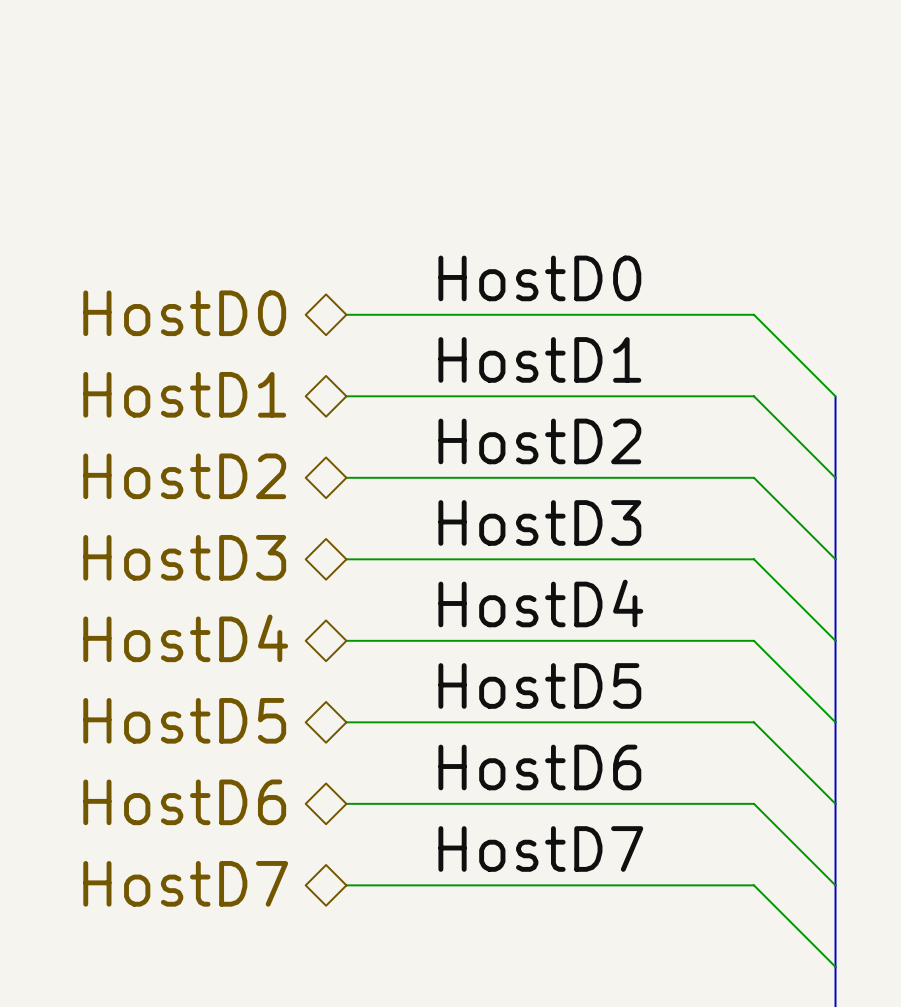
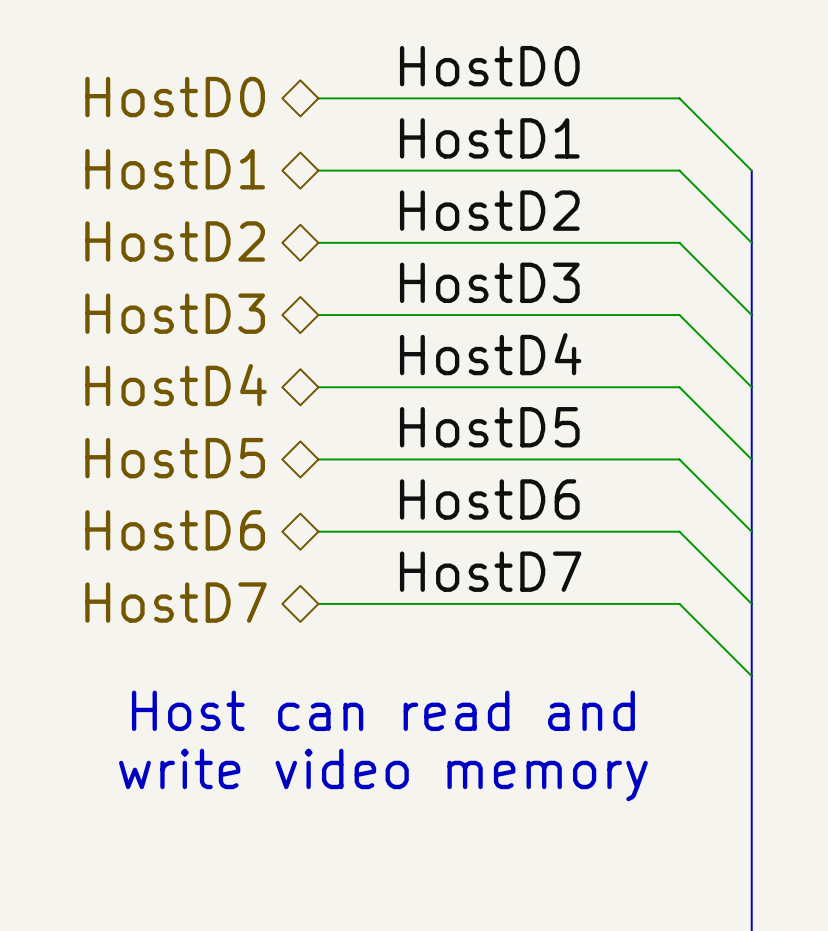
bus: none -> (751, 170) (751, 351)
label position: HostD0 (539, 278) -> HostD0 (489, 66)
hierarchical label position: HostD0 (184, 313) -> HostD0 (175, 97)
wire: (346, 314) (753, 314) (835, 396) -> (318, 98) (679, 98) (751, 170)
label position: HostD1 (539, 359) -> HostD1 (489, 138)
hierarchical label position: HostD1 (184, 394) -> HostD1 (175, 169)
wire: (346, 396) (753, 396) (835, 477) -> (318, 170) (679, 170) (751, 242)
label position: HostD2 (539, 441) -> HostD2 (489, 210)
hierarchical label position: HostD2 (184, 476) -> HostD2 (175, 241)
wire: (346, 477) (753, 477) (835, 559) -> (318, 242) (679, 242) (751, 315)
label position: HostD3 (539, 522) -> HostD3 (489, 282)
hierarchical label position: HostD3 (184, 557) -> HostD3 (175, 313)
wire: (346, 559) (753, 559) (835, 640) -> (318, 315) (679, 315) (751, 387)
label position: HostD4 (540, 603) -> HostD4 (490, 354)
hierarchical label position: HostD4 (185, 638) -> HostD4 (176, 385)
wire: (346, 640) (753, 640) (835, 722) -> (318, 387) (679, 387) (751, 459)
label position: HostD5 (539, 685) -> HostD5 (489, 427)
hierarchical label position: HostD5 (184, 720) -> HostD5 (175, 458)
wire: (346, 722) (753, 722) (835, 803) -> (318, 459) (679, 459) (751, 531)
label position: HostD6 (539, 767) -> HostD6 (489, 499)
hierarchical label position: HostD6 (184, 802) -> HostD6 (175, 530)
text: none -> Host can read and (383, 710)
wire: (346, 803) (753, 803) (835, 885) -> (318, 531) (679, 531) (751, 603)
label position: HostD7 (540, 848) -> HostD7 (490, 571)
text: none -> write video memory (383, 774)
hierarchical label position: HostD7 (185, 883) -> HostD7 (176, 602)
wire: (346, 885) (753, 885) (835, 966) -> (318, 603) (679, 603) (751, 676)

